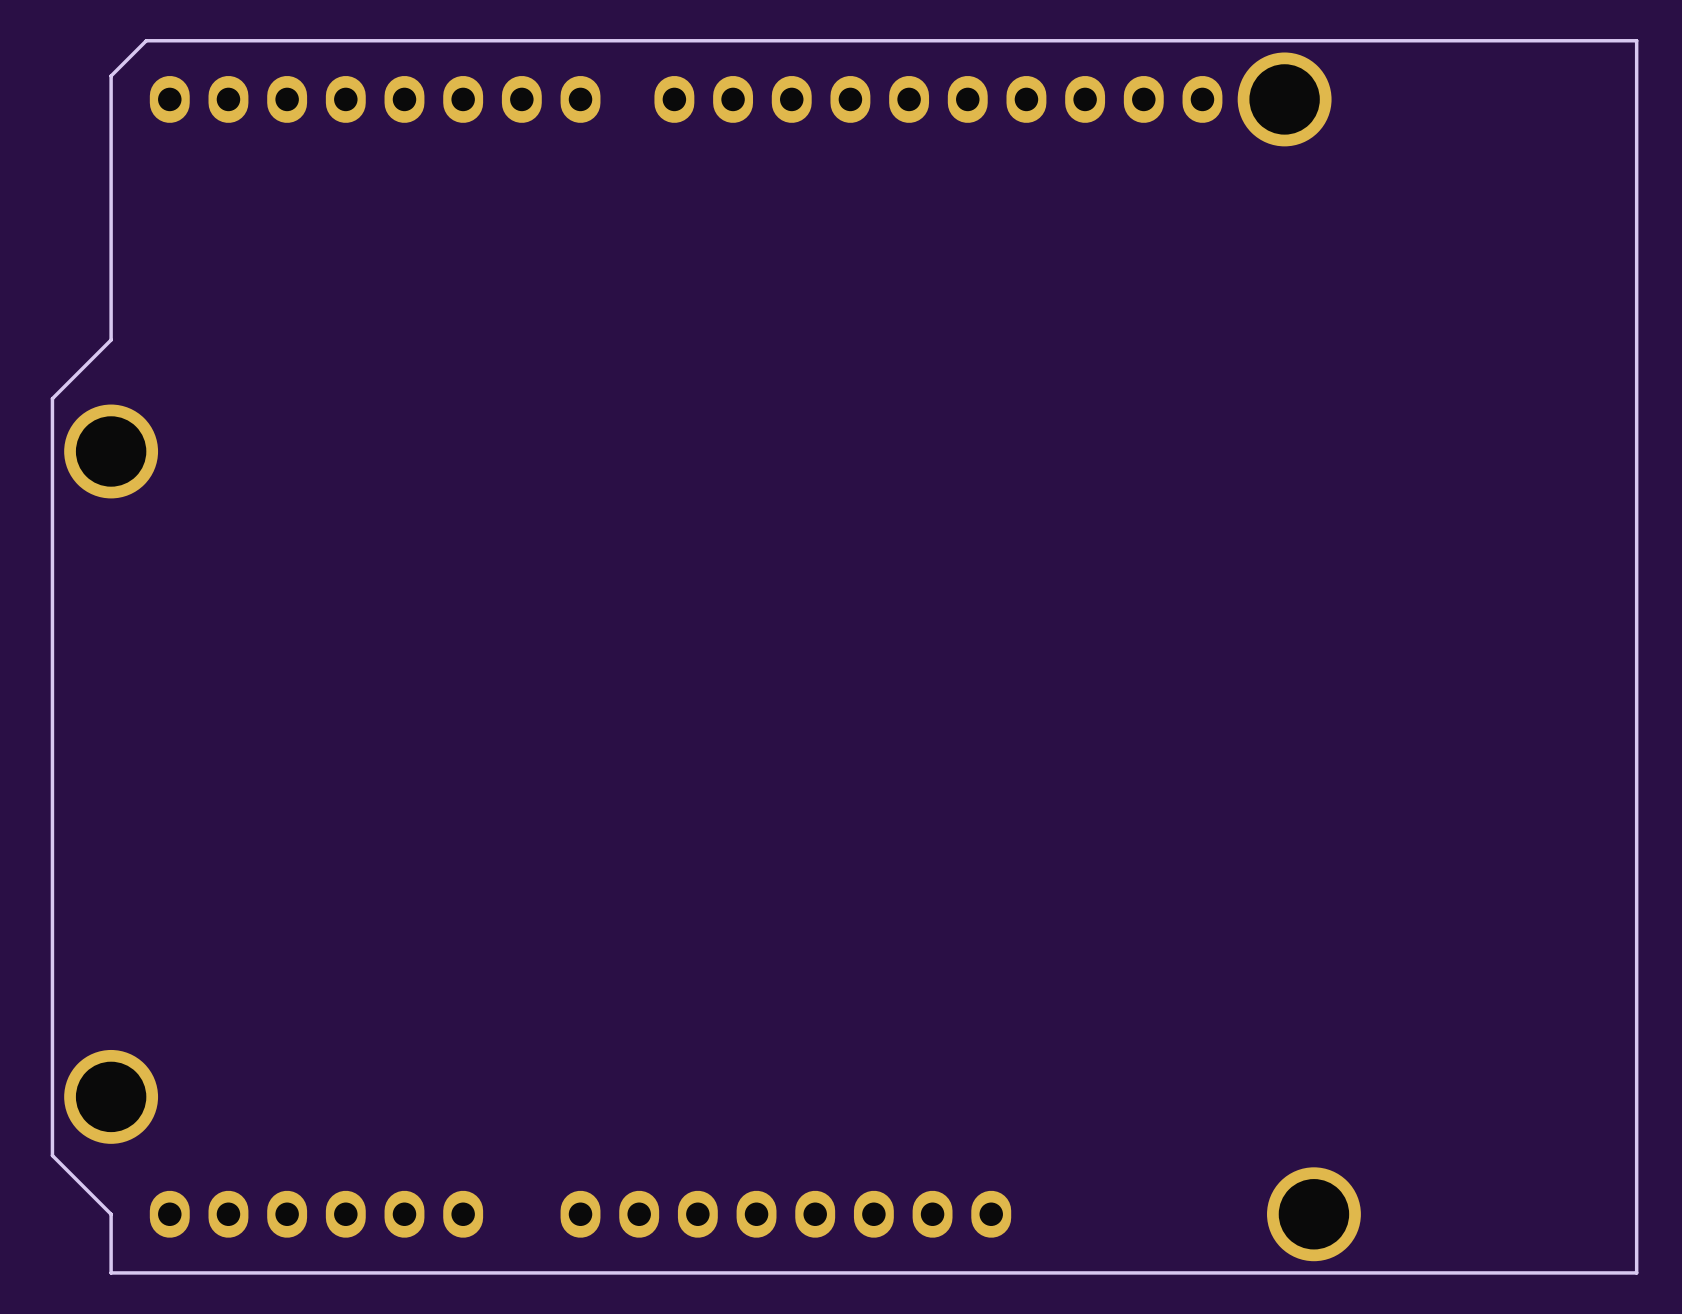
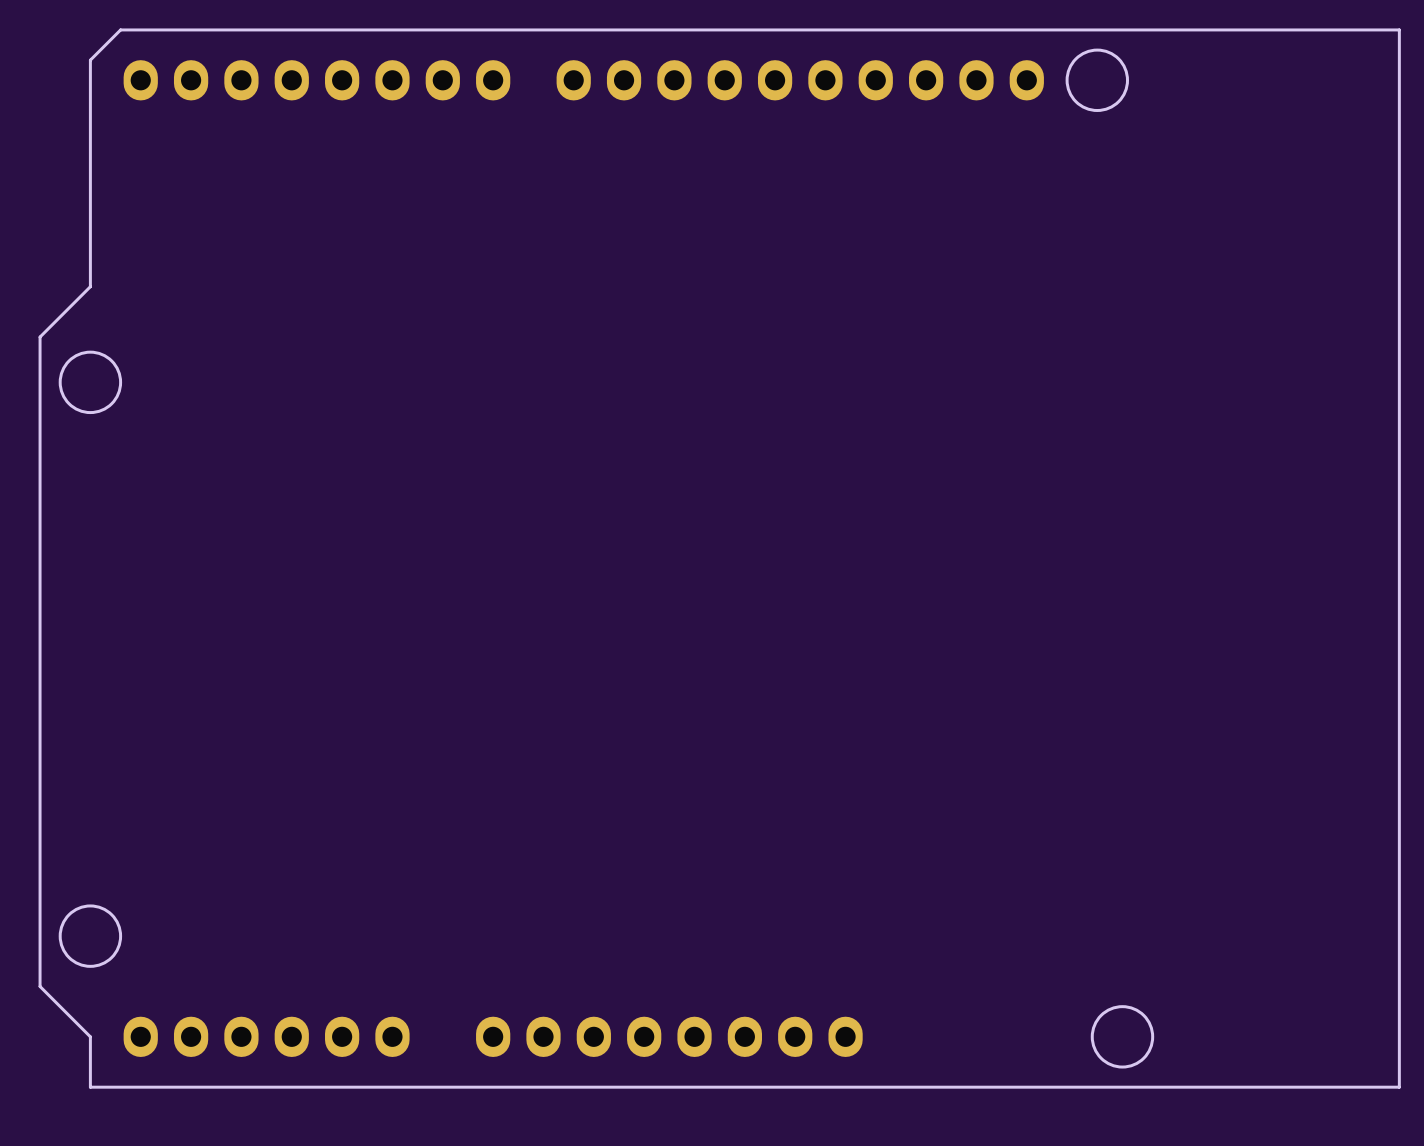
round board edge: none -> [1065, 48, 1129, 112]
part: (1284, 99) -> none
round board edge: none -> [58, 350, 123, 415]
part: (111, 451) -> none
round board edge: none -> [58, 904, 123, 968]
part: (111, 1096) -> none
round board edge: none -> [1090, 1005, 1155, 1069]
part: (1313, 1214) -> none

